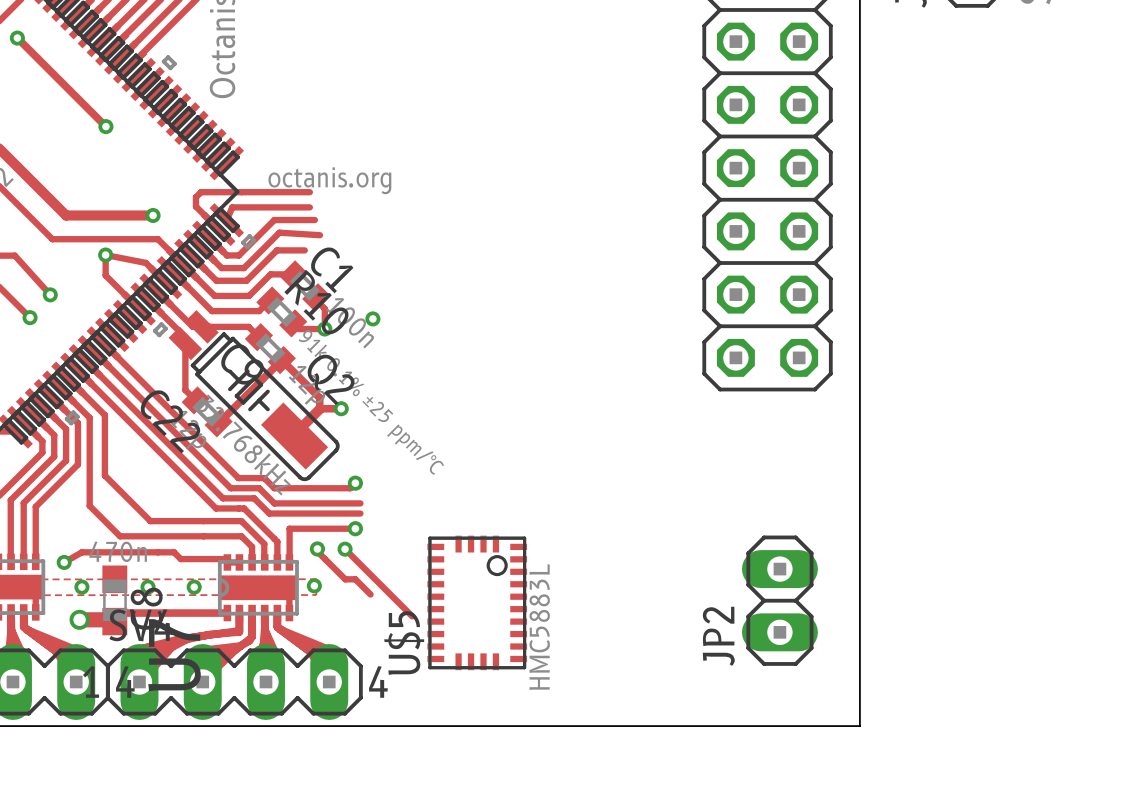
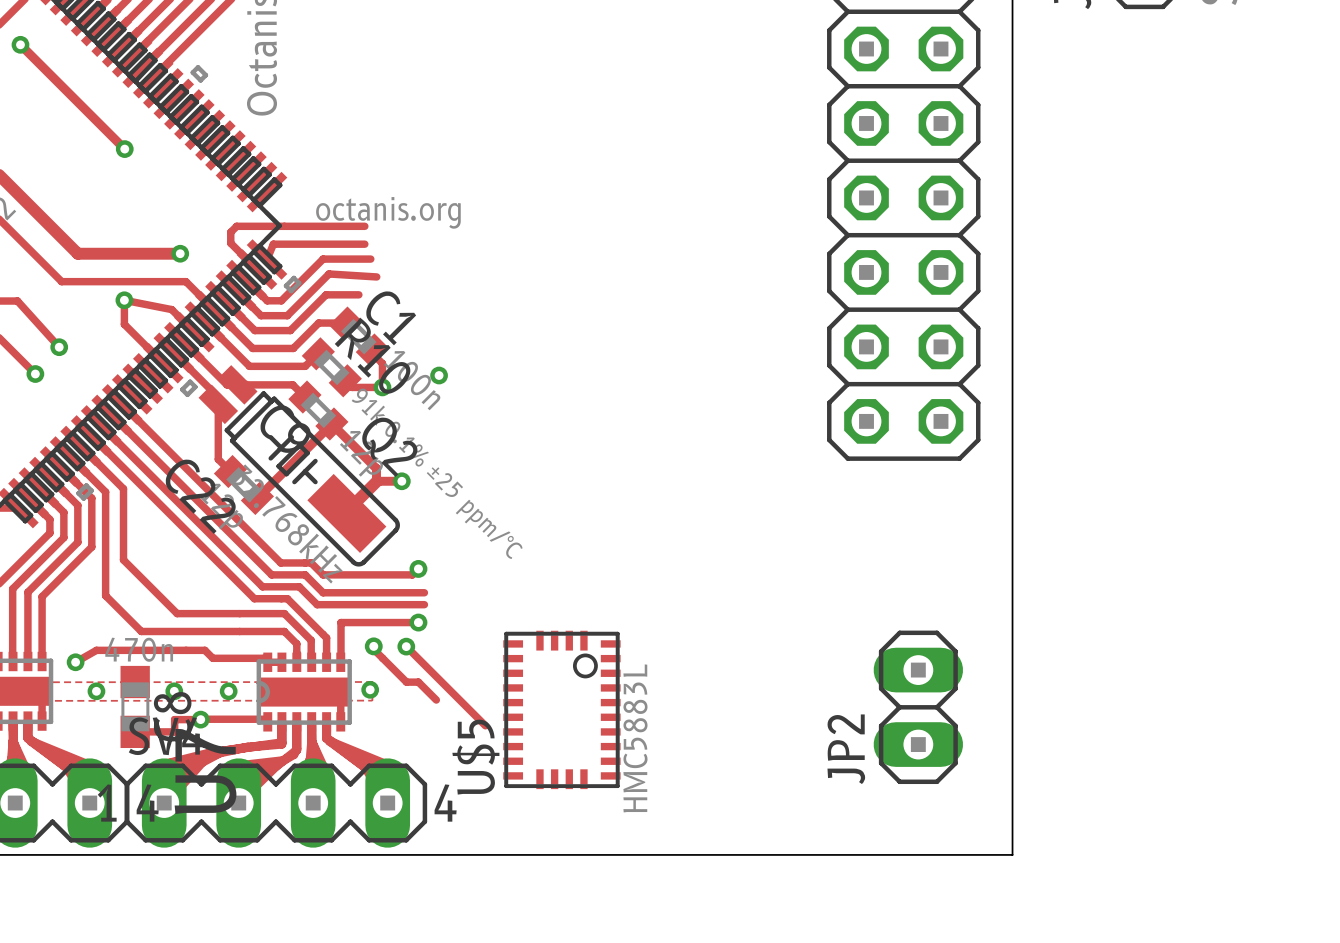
track: none -> (200, 719) (174, 719) (174, 731) (135, 731)
via: none -> (200, 719)
track: (227, 613) (123, 613) (114, 621) (110, 619) (79, 619) -> (267, 721) (267, 719) (200, 719)
via: (79, 619) -> none

